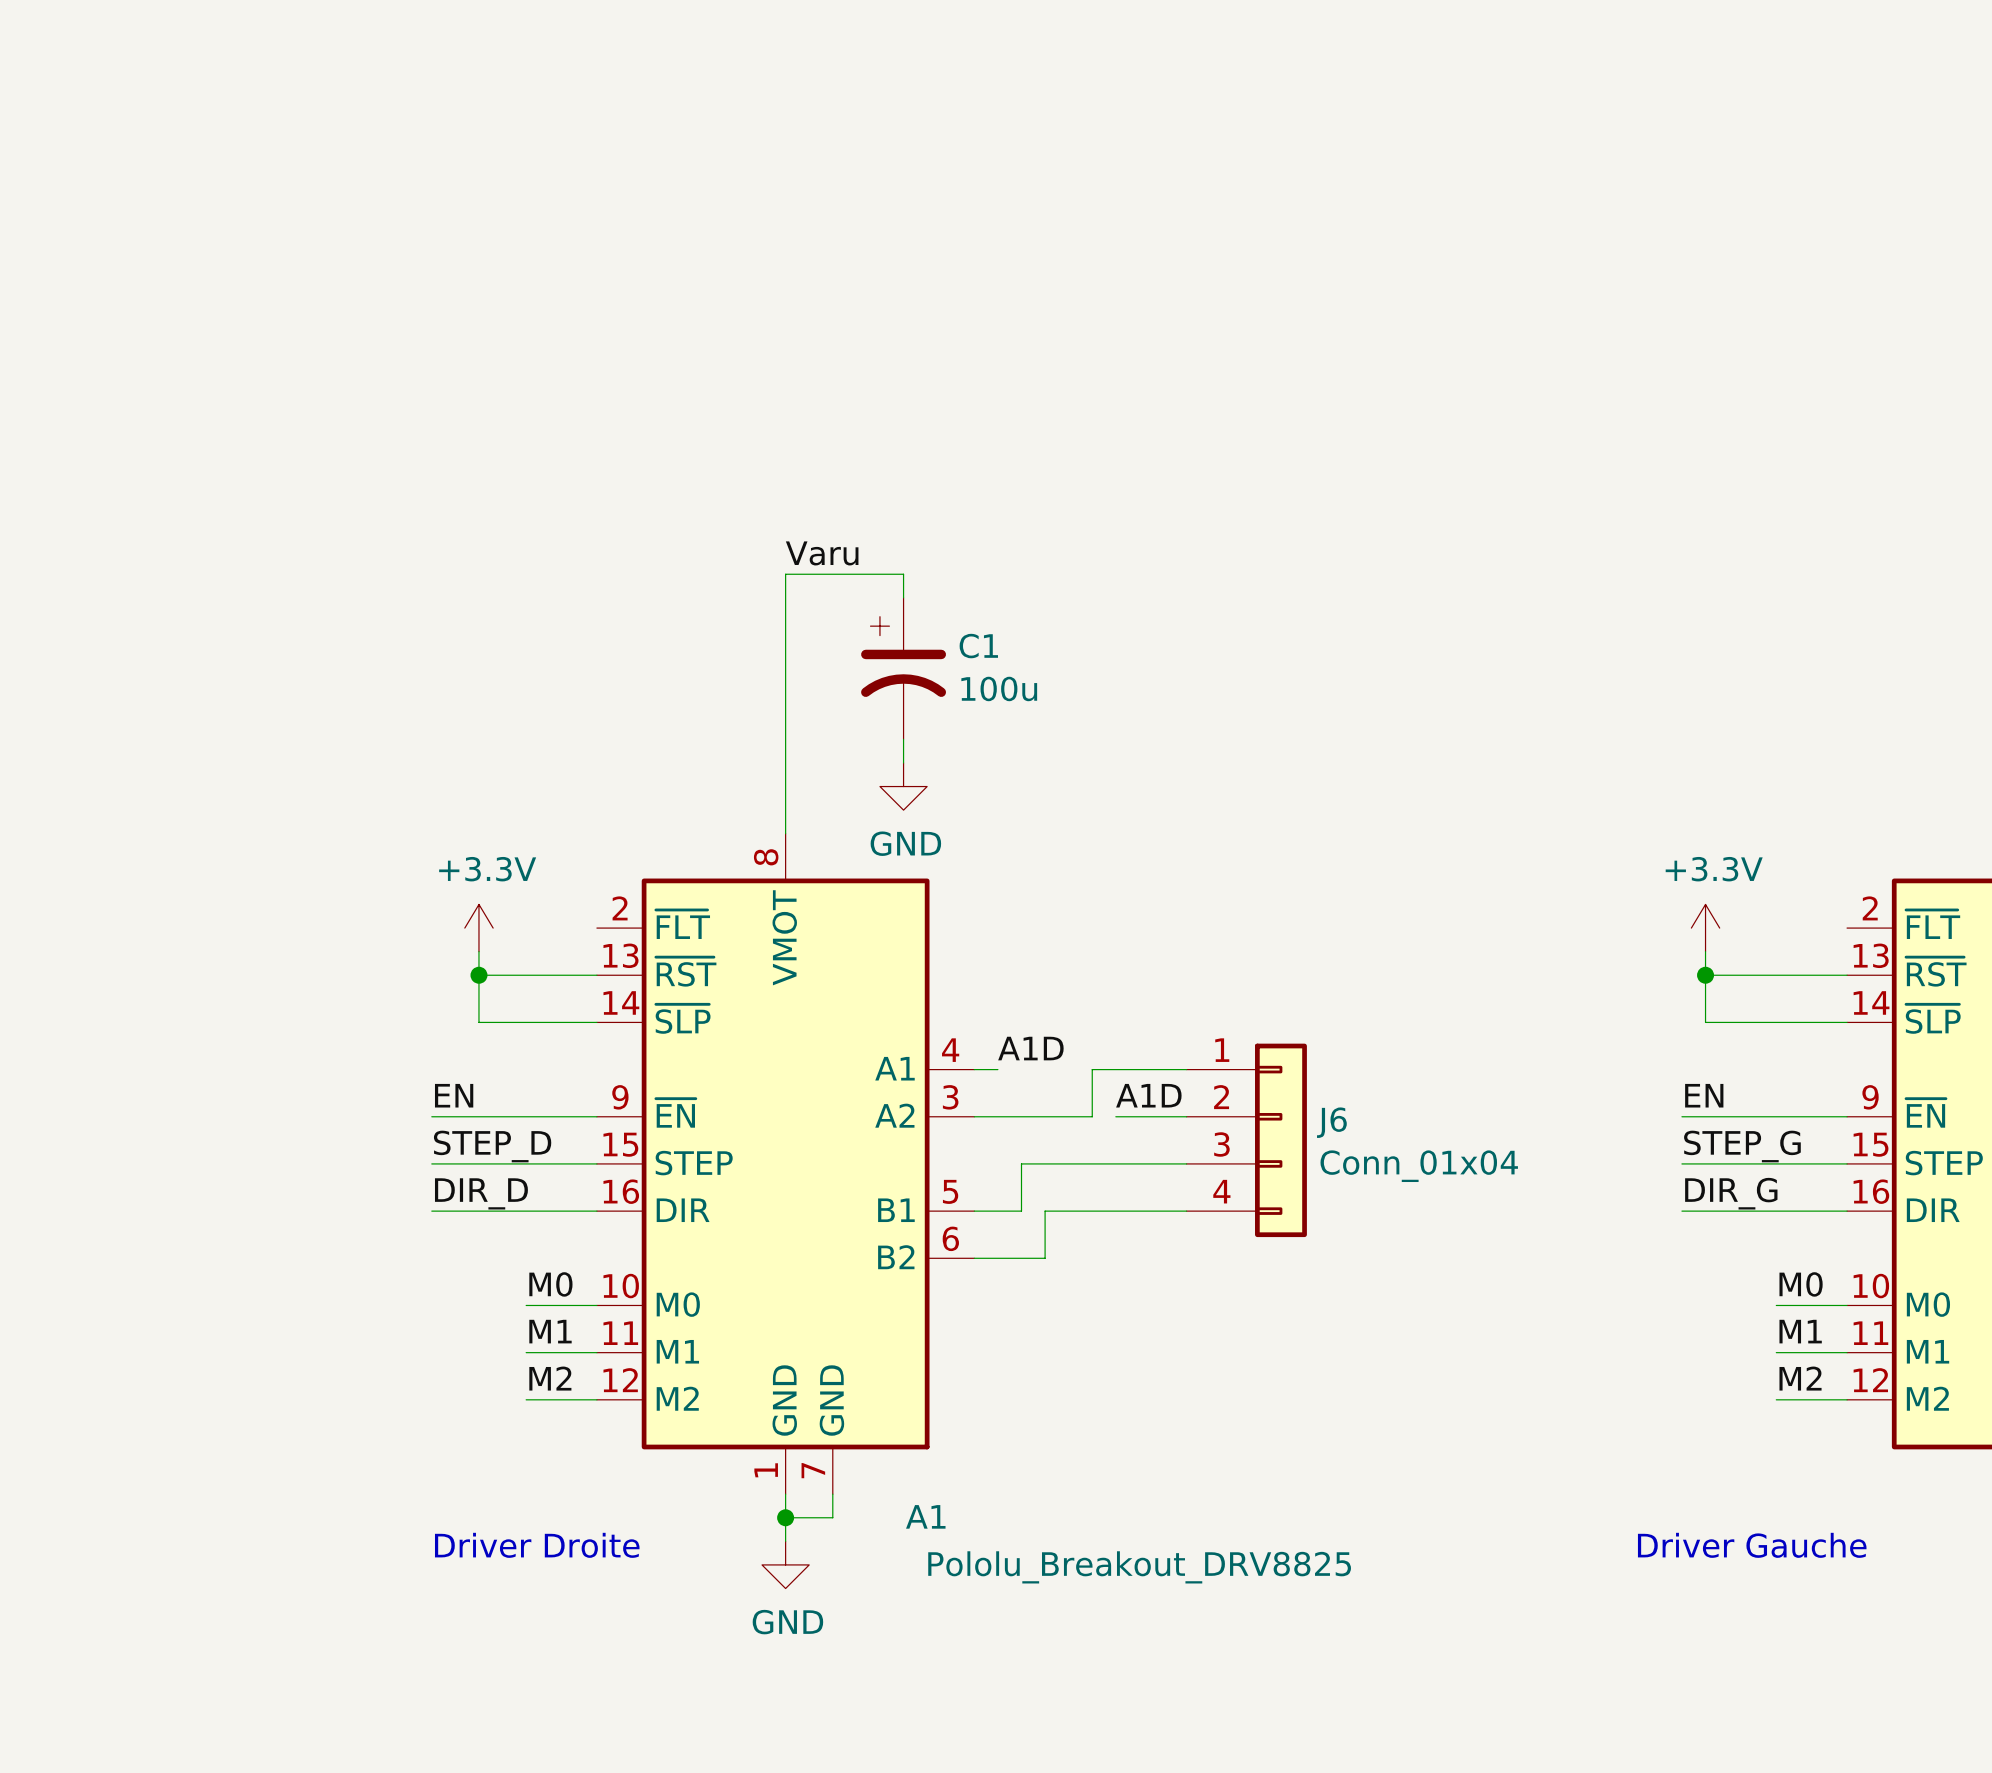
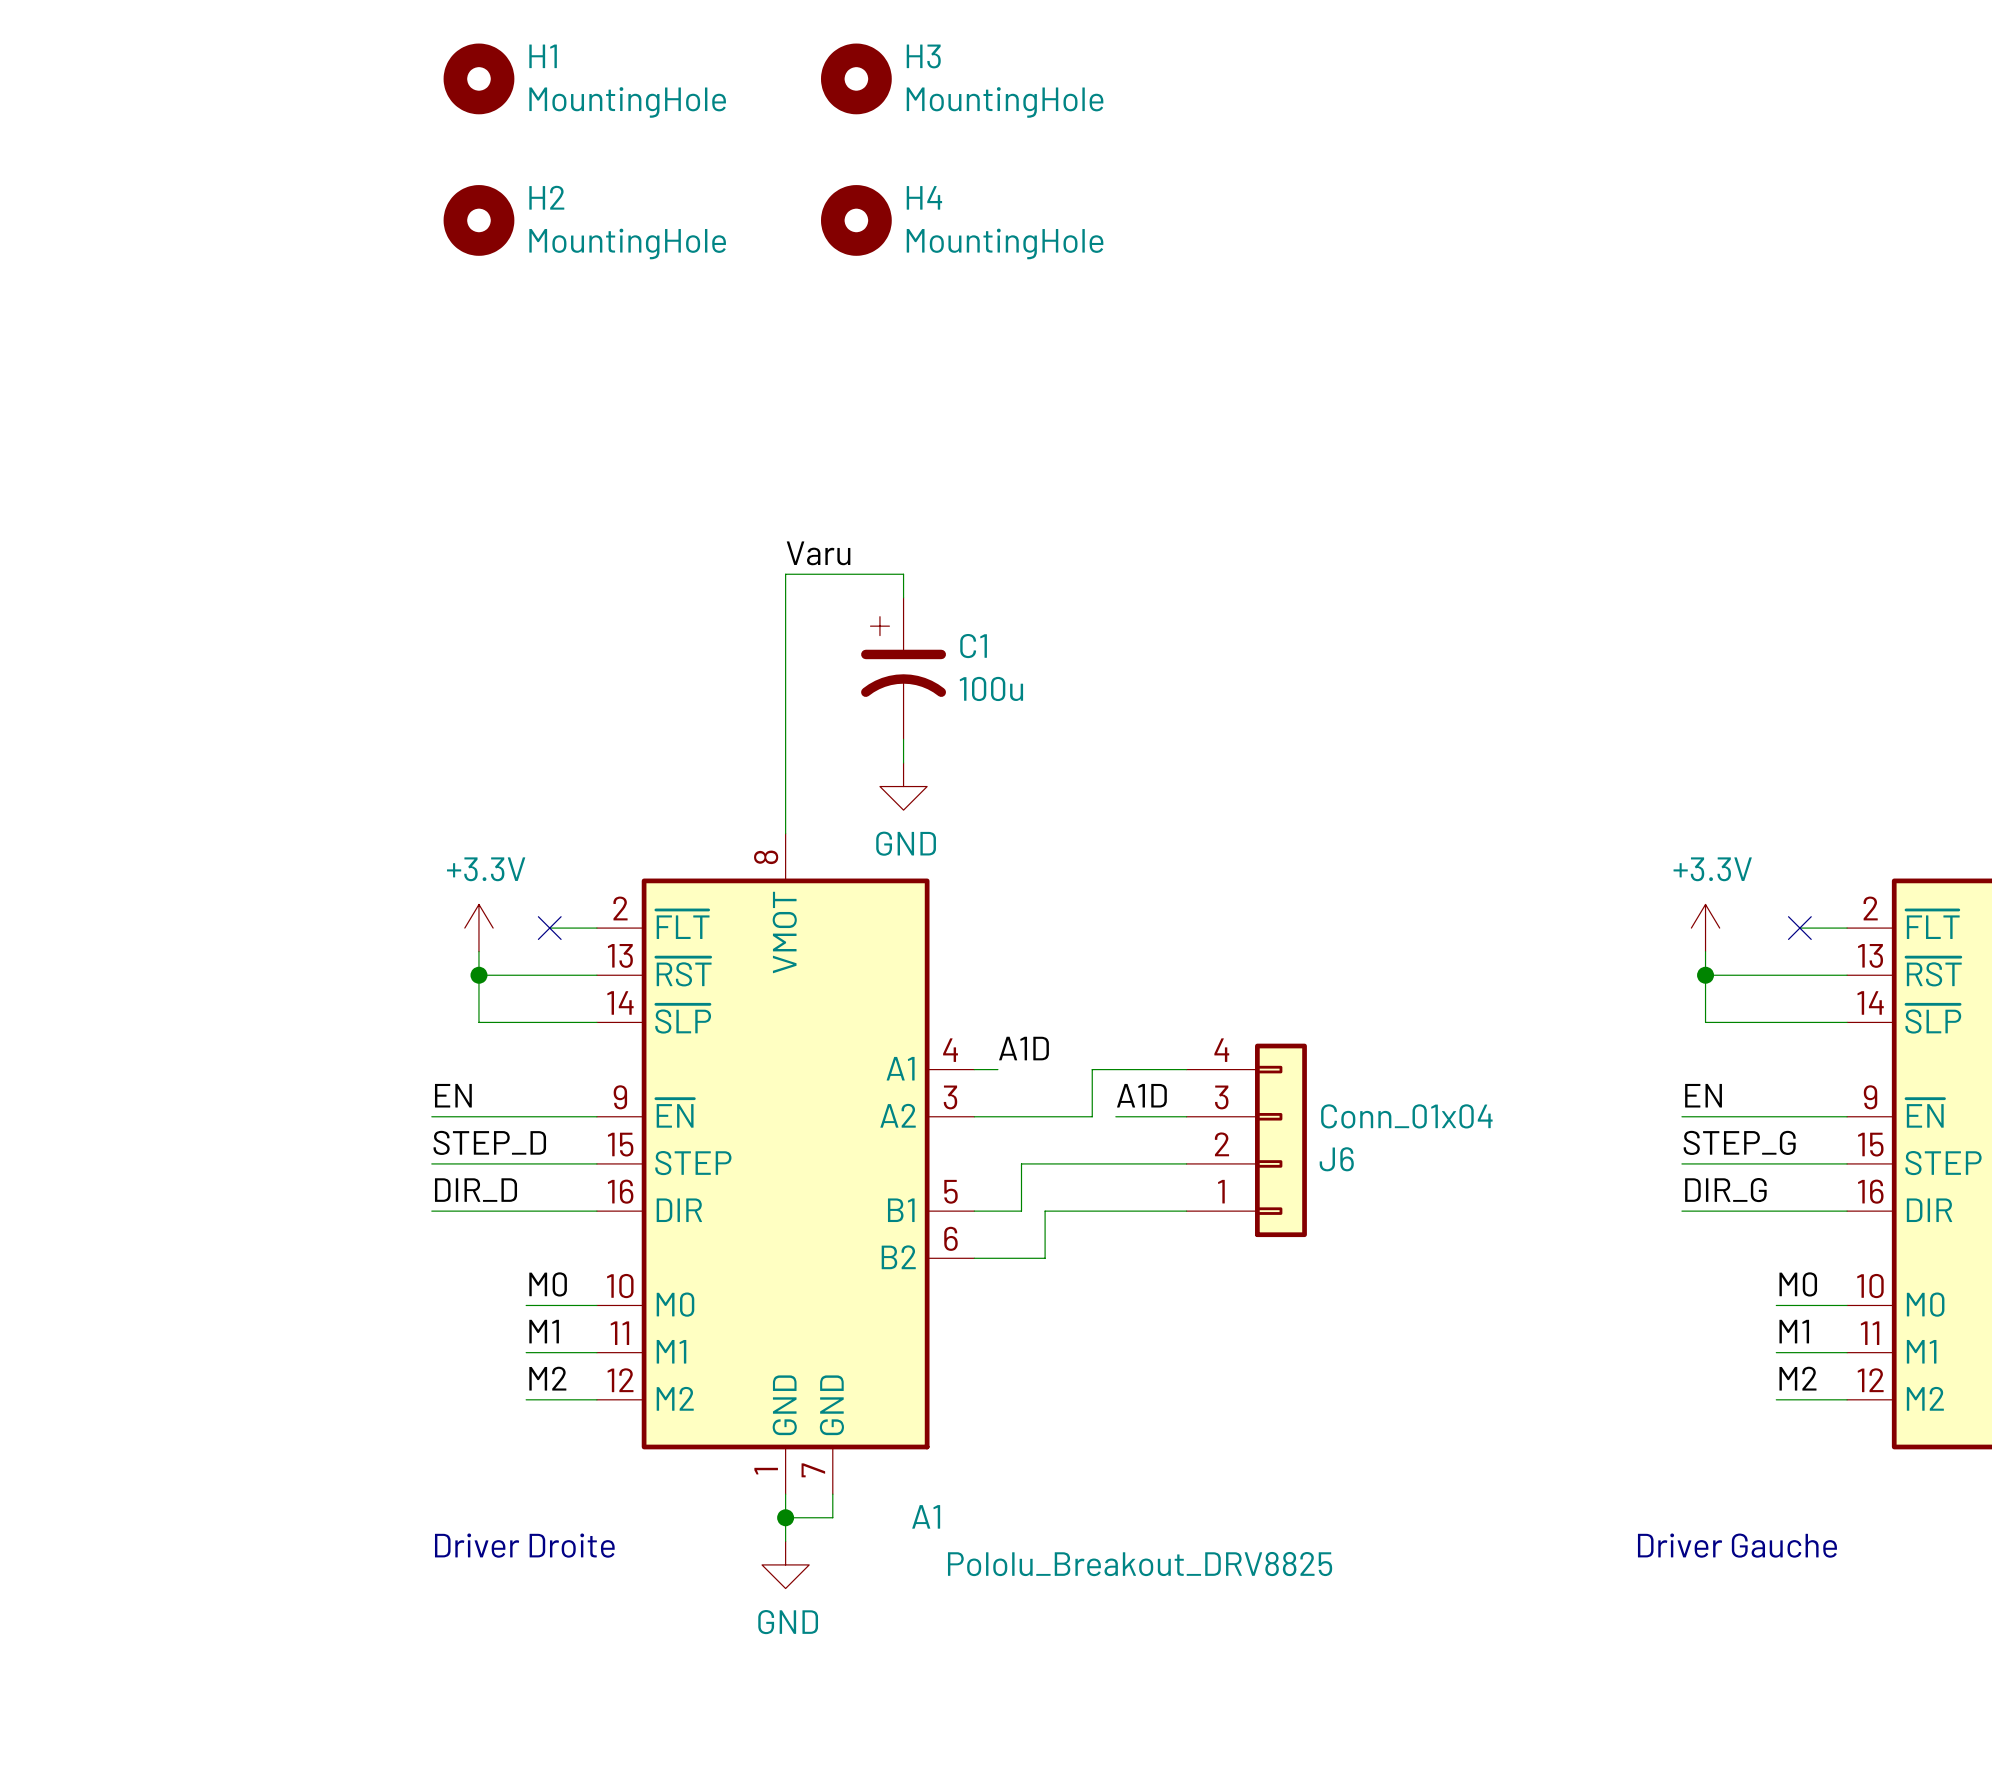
H1: none -> MountingHole (478, 78)
H3: none -> MountingHole (856, 78)
H2: none -> MountingHole (478, 220)
H4: none -> MountingHole (856, 220)
wire: none -> (549, 928) (596, 928)
no-connect mark: none -> (549, 928)
wire: none -> (1799, 928) (1847, 928)
no-connect mark: none -> (1799, 928)
J6 flip: as is (1280, 1140) -> up-down (1280, 1140)

